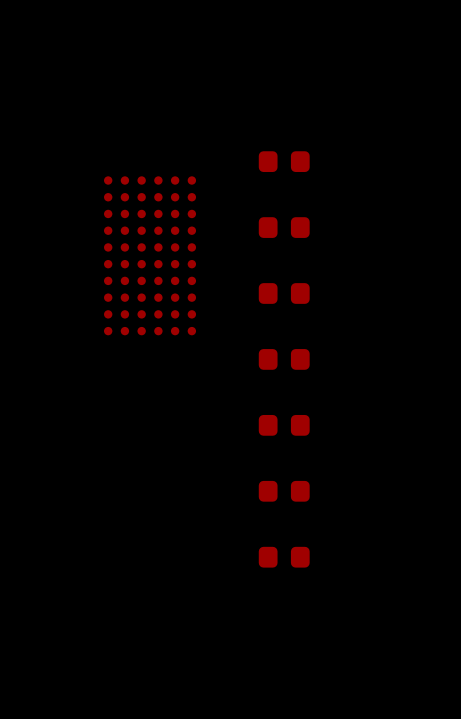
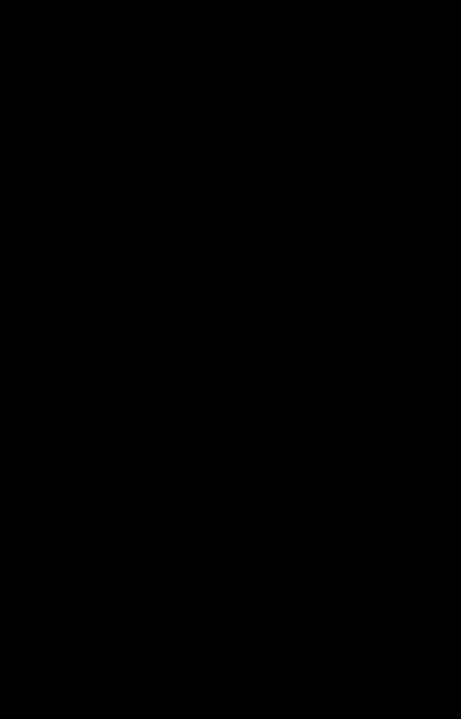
part: (284, 161) -> none
part: (284, 227) -> none
part: (150, 255) -> none
part: (284, 293) -> none
part: (284, 359) -> none
part: (284, 425) -> none
part: (284, 491) -> none
part: (284, 557) -> none

